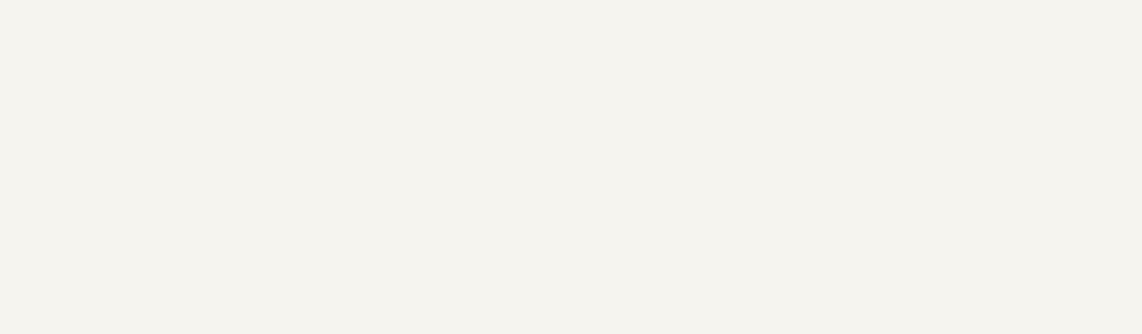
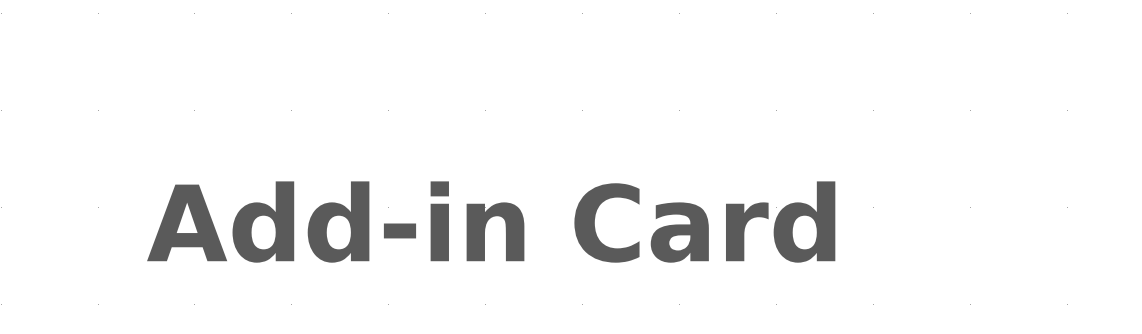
text: none -> Add-in Card (491, 222)

